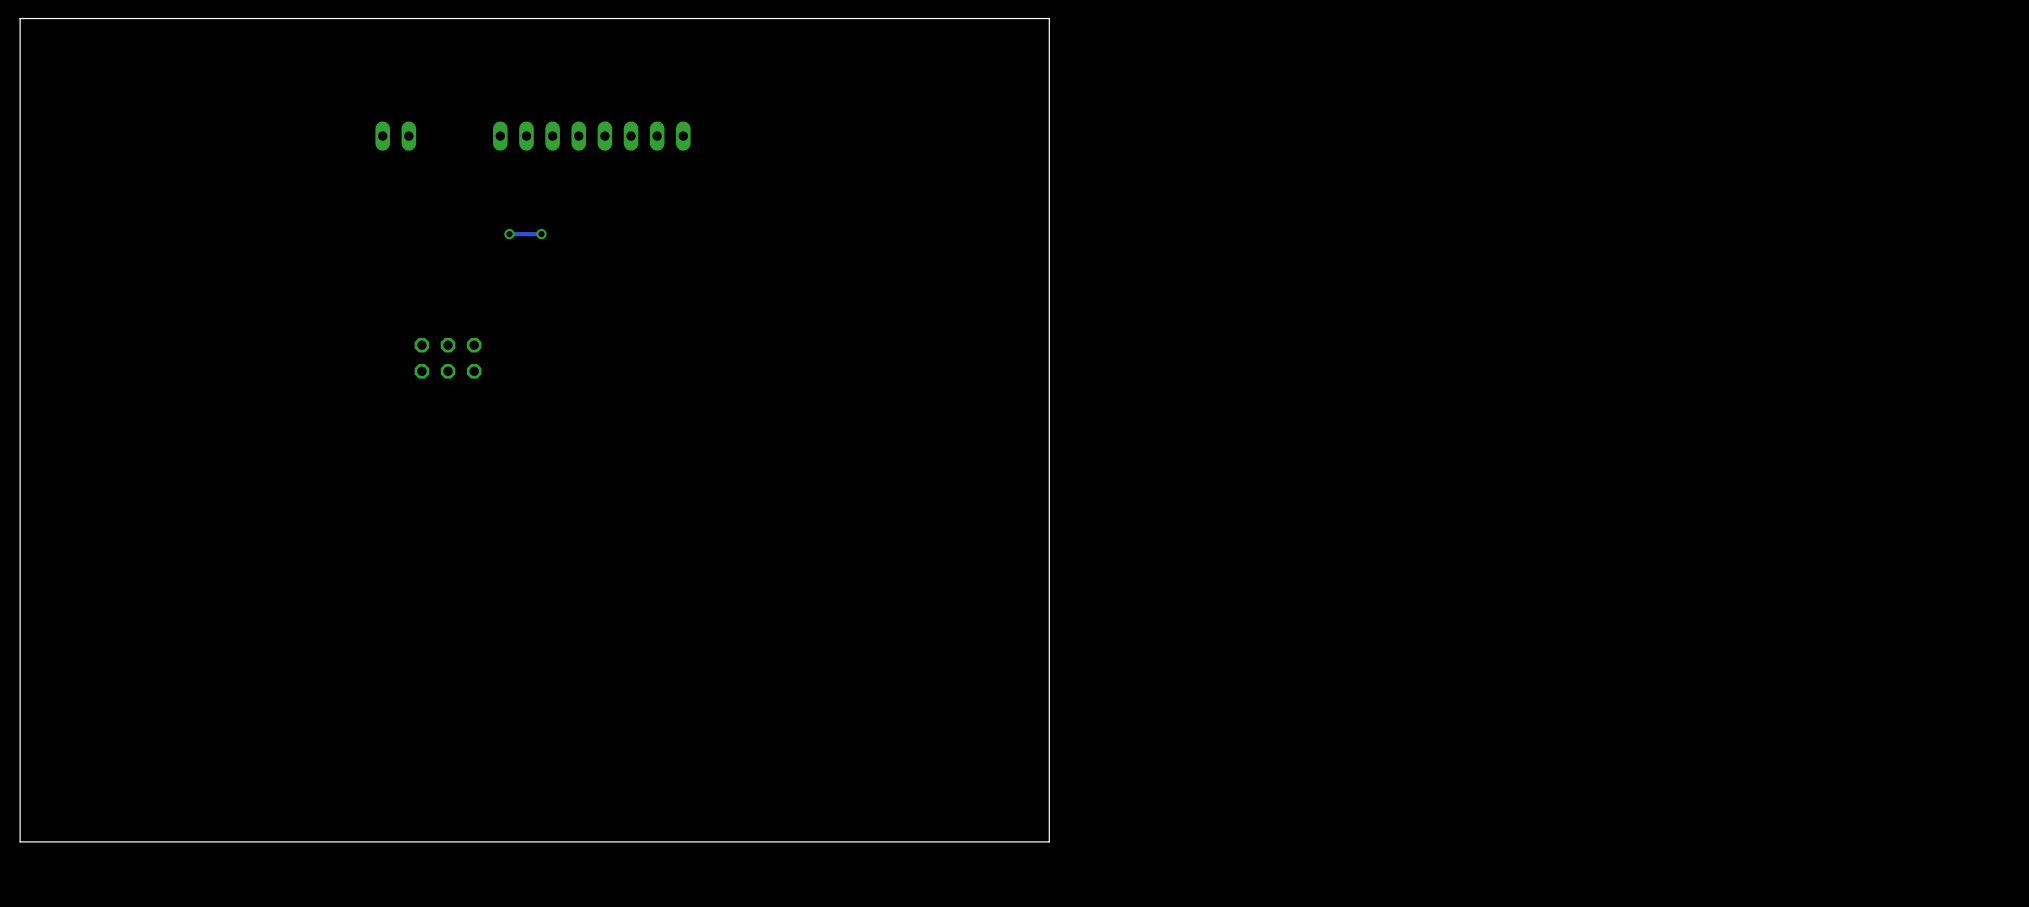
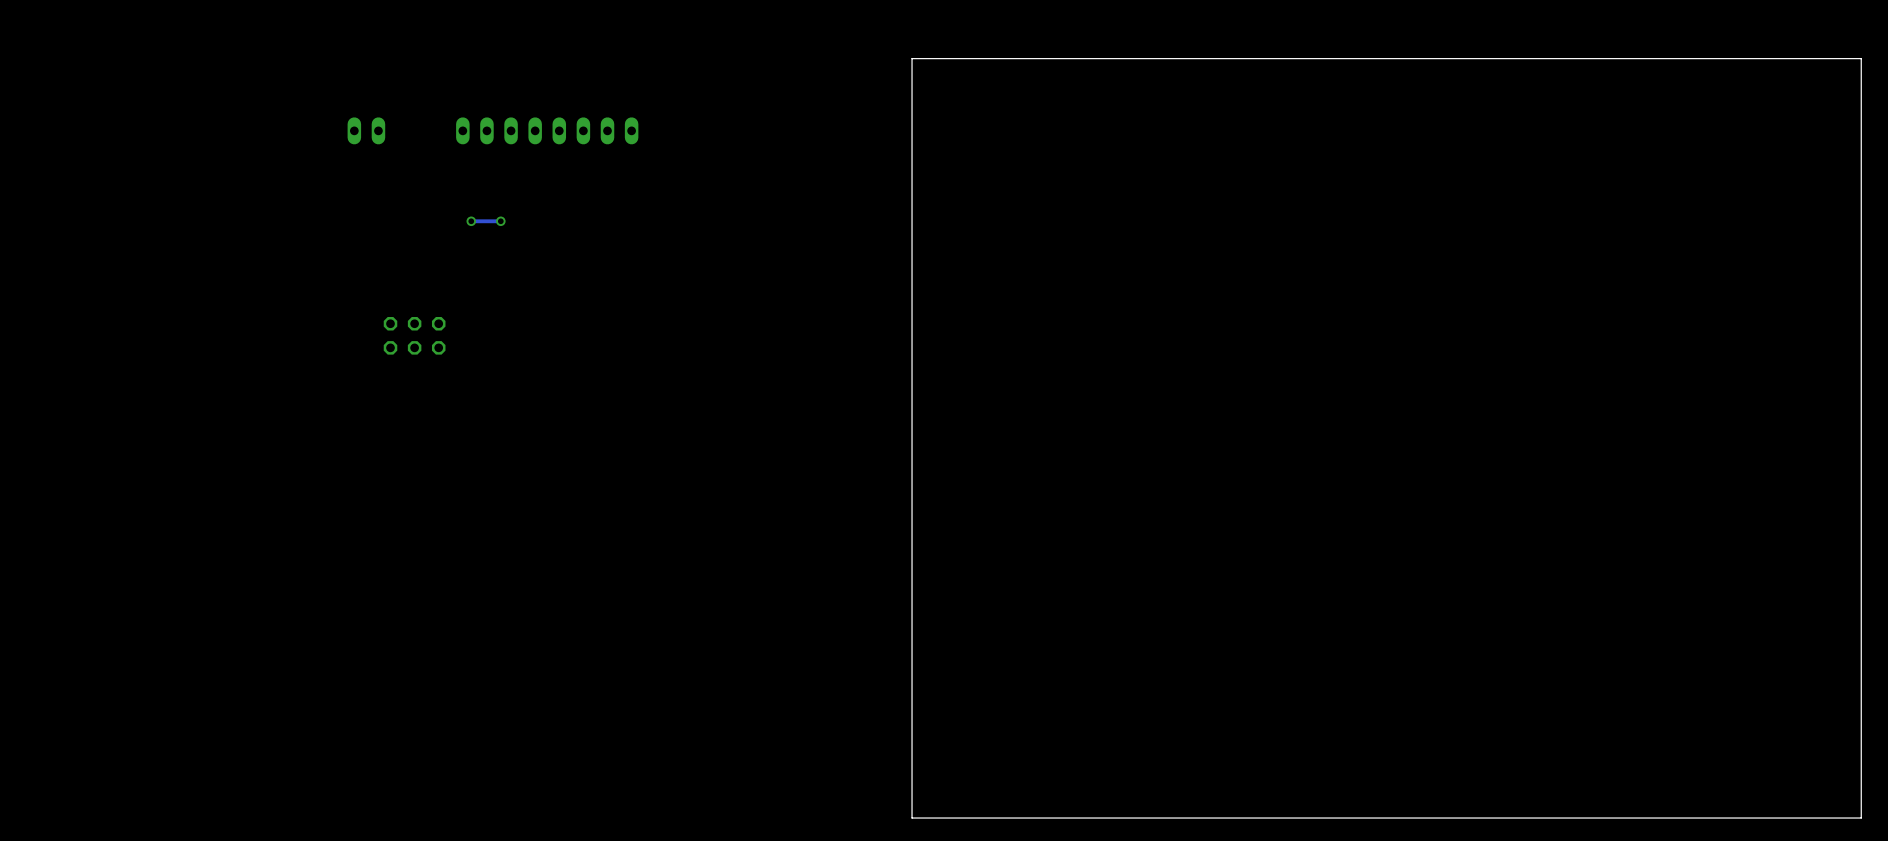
board edge: (1049, 18) (20, 18) (20, 841) (1049, 841) (1049, 18) -> none
board edge: none -> (1861, 58) (912, 58) (912, 818) (1861, 818) (1861, 58)

